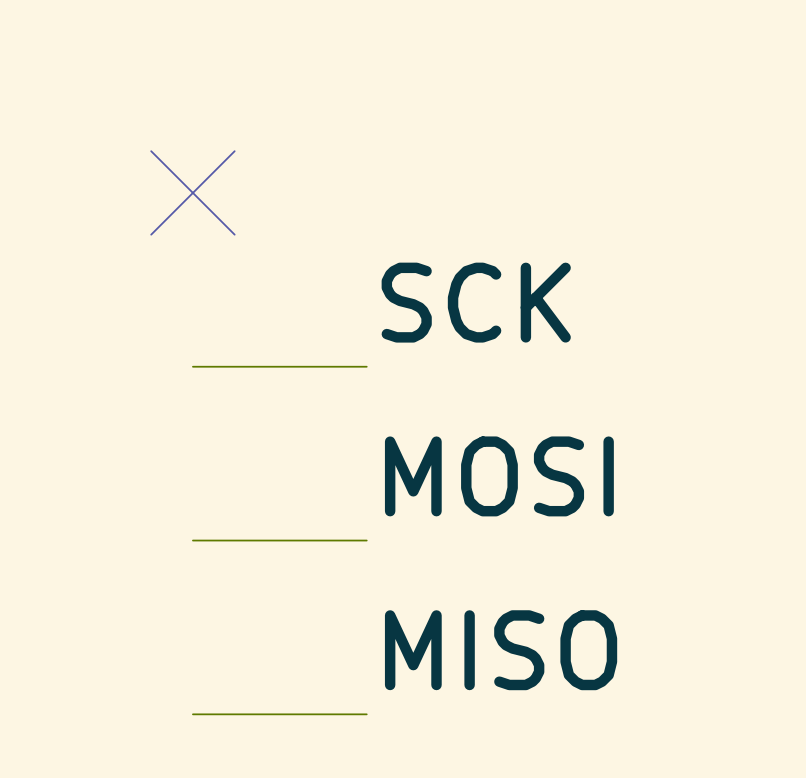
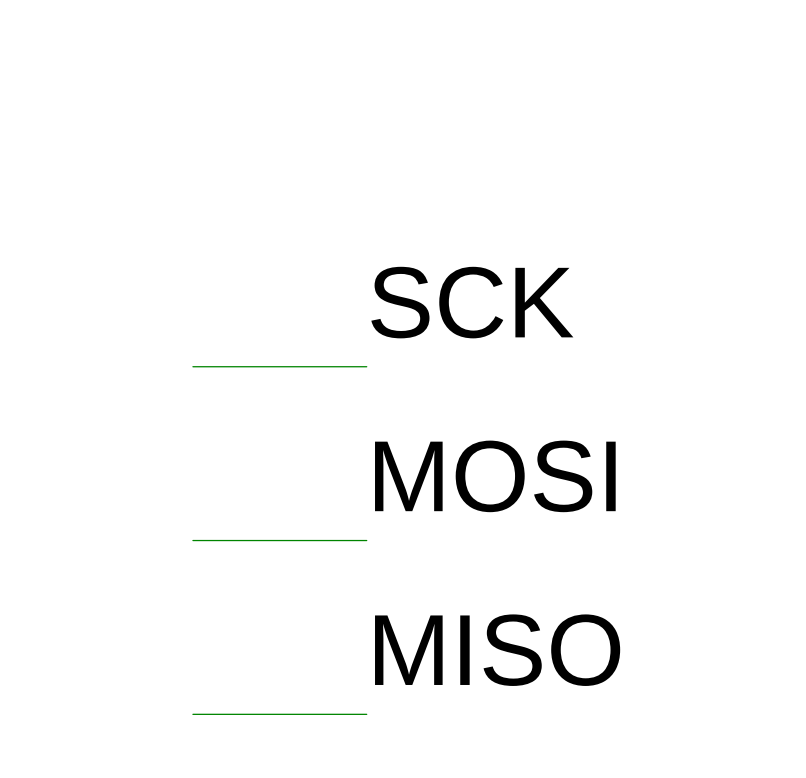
no-connect mark: (192, 192) -> none

